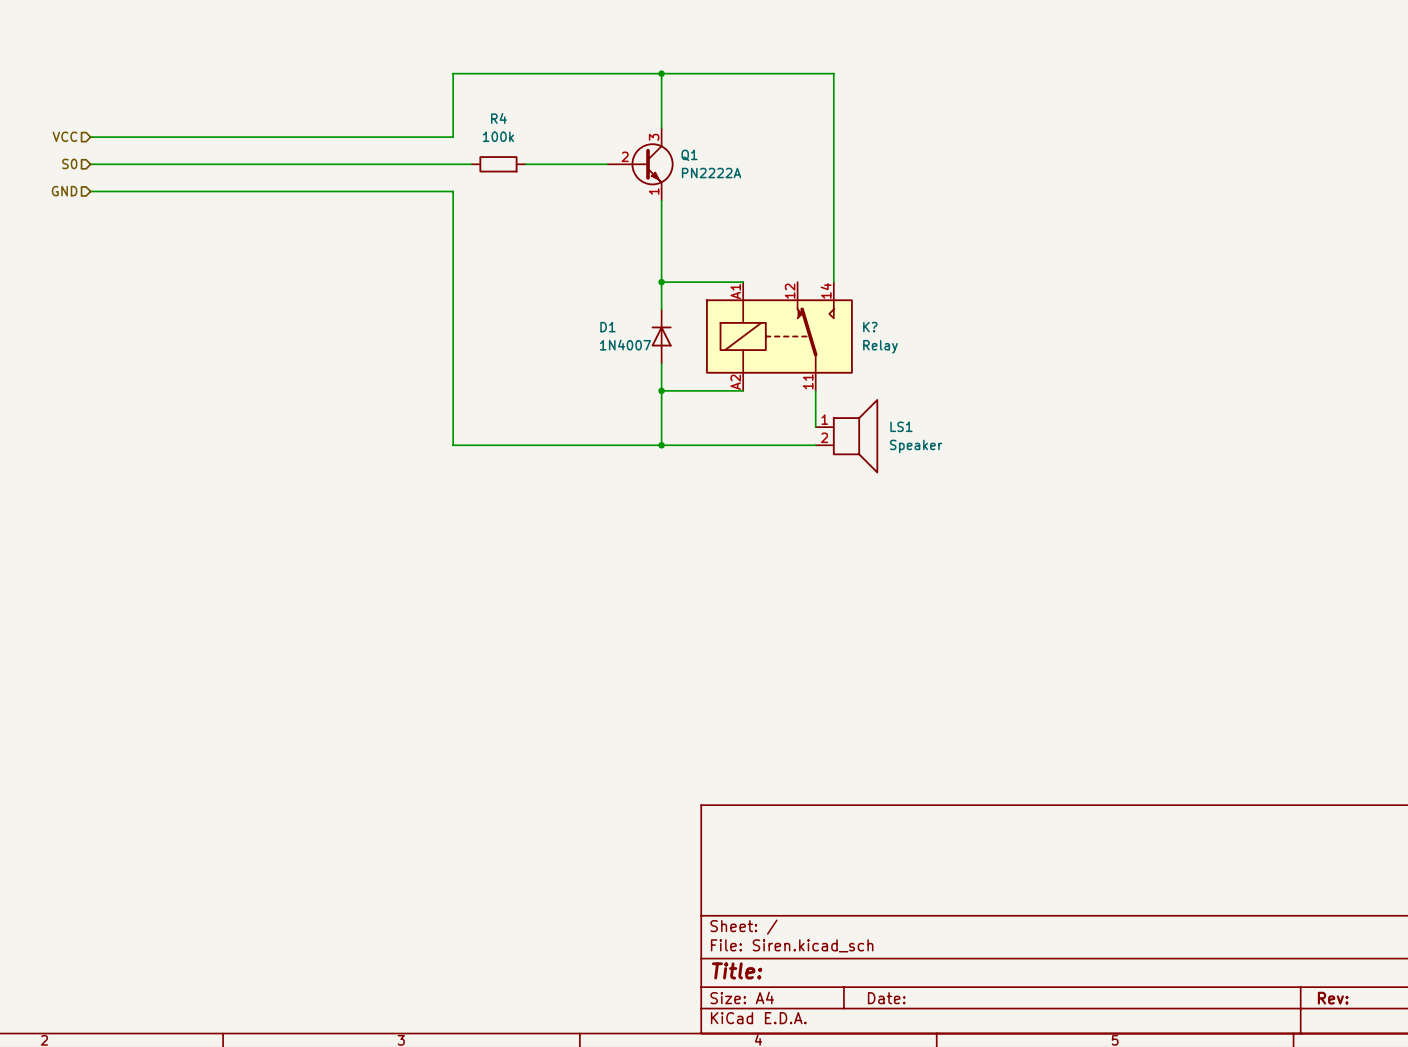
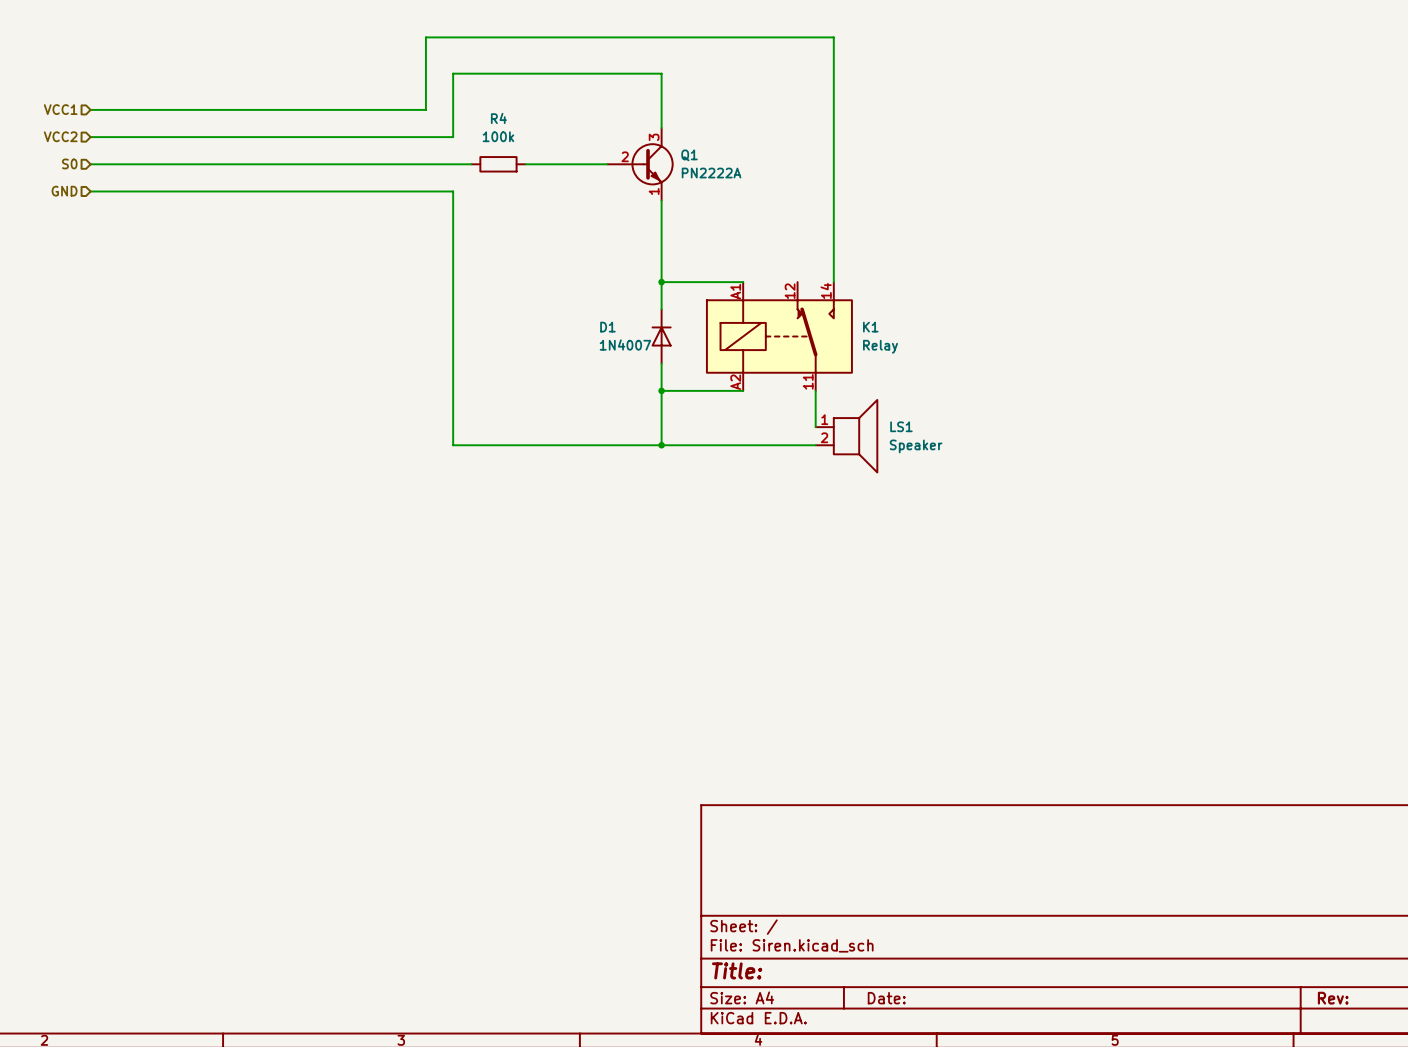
wire: (661, 73) (833, 73) -> (90, 109) (425, 109) (425, 37) (833, 37) (833, 73)
junction: (661, 73) -> none
hierarchical label: none -> VCC1 (60, 109)
hierarchical label: VCC (65, 136) -> VCC2 (60, 136)
K? name: K? (870, 327) -> K1 (870, 327)

